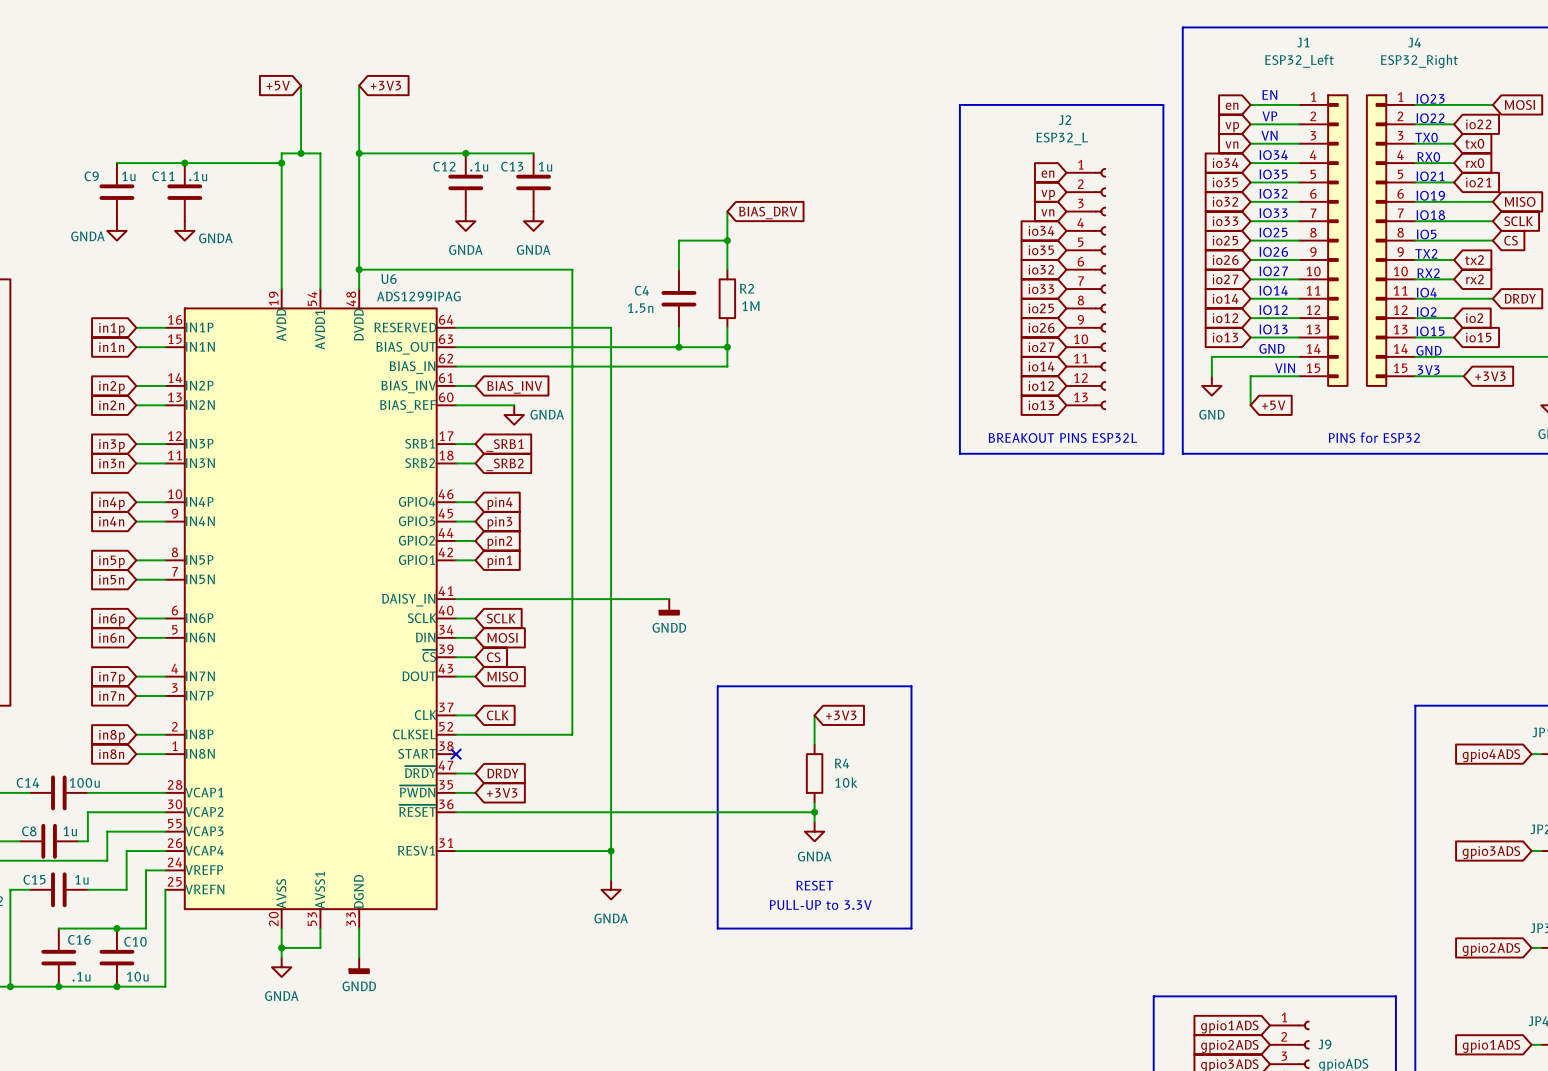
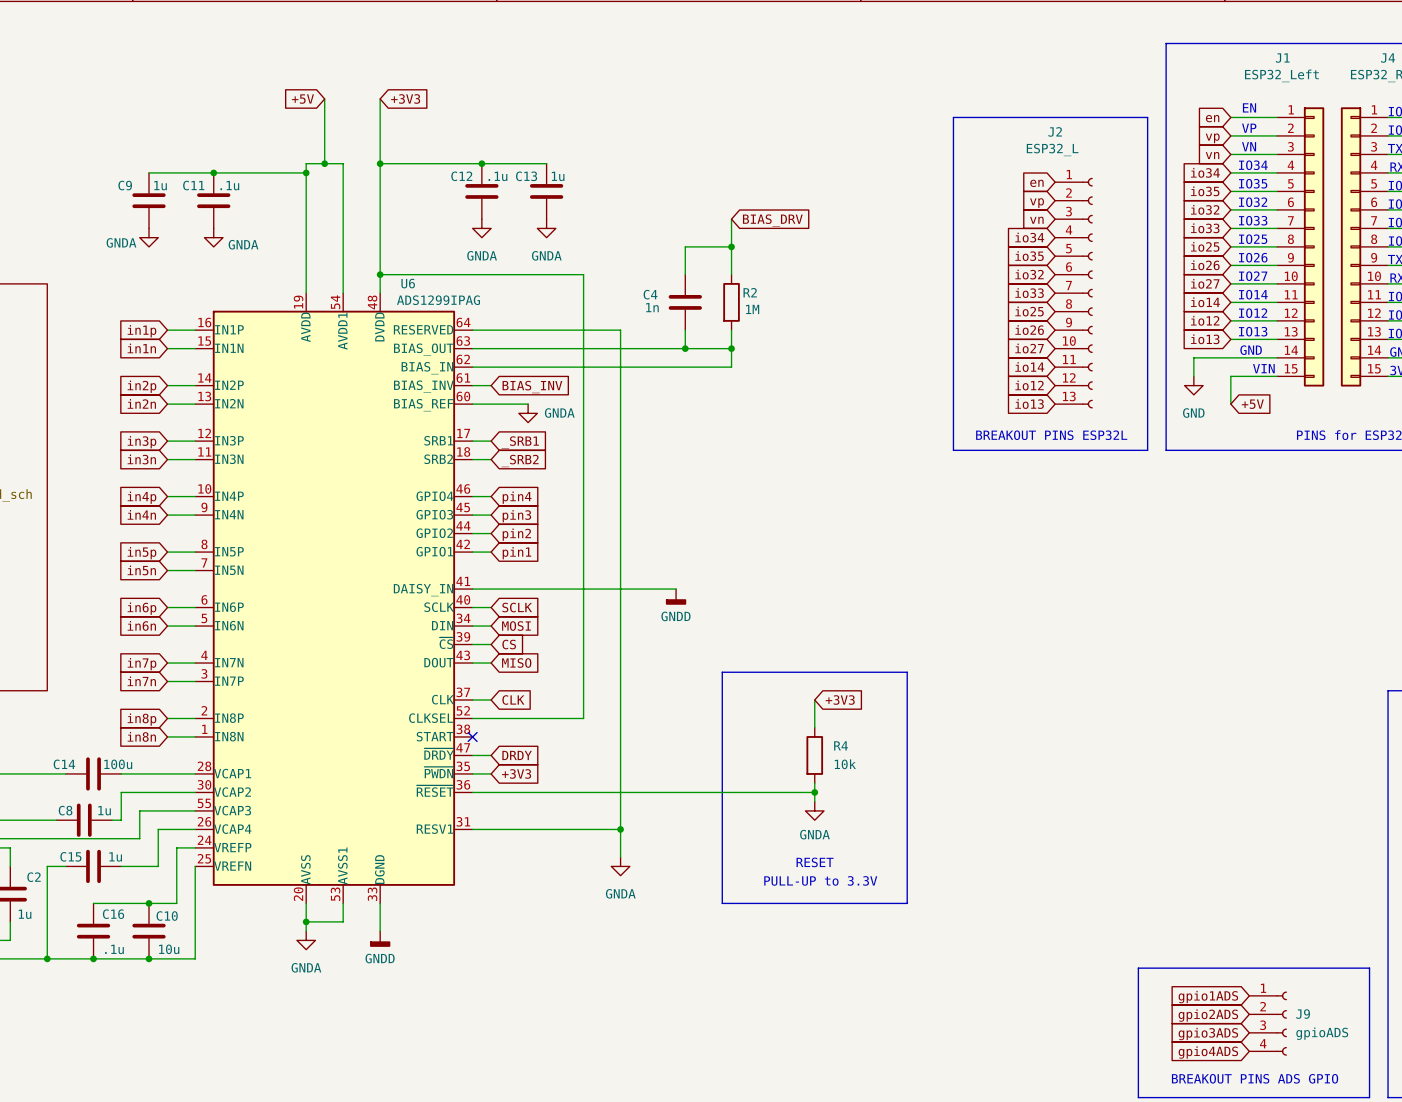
C4 value: 1.5n (640, 308) -> 1n (652, 307)

